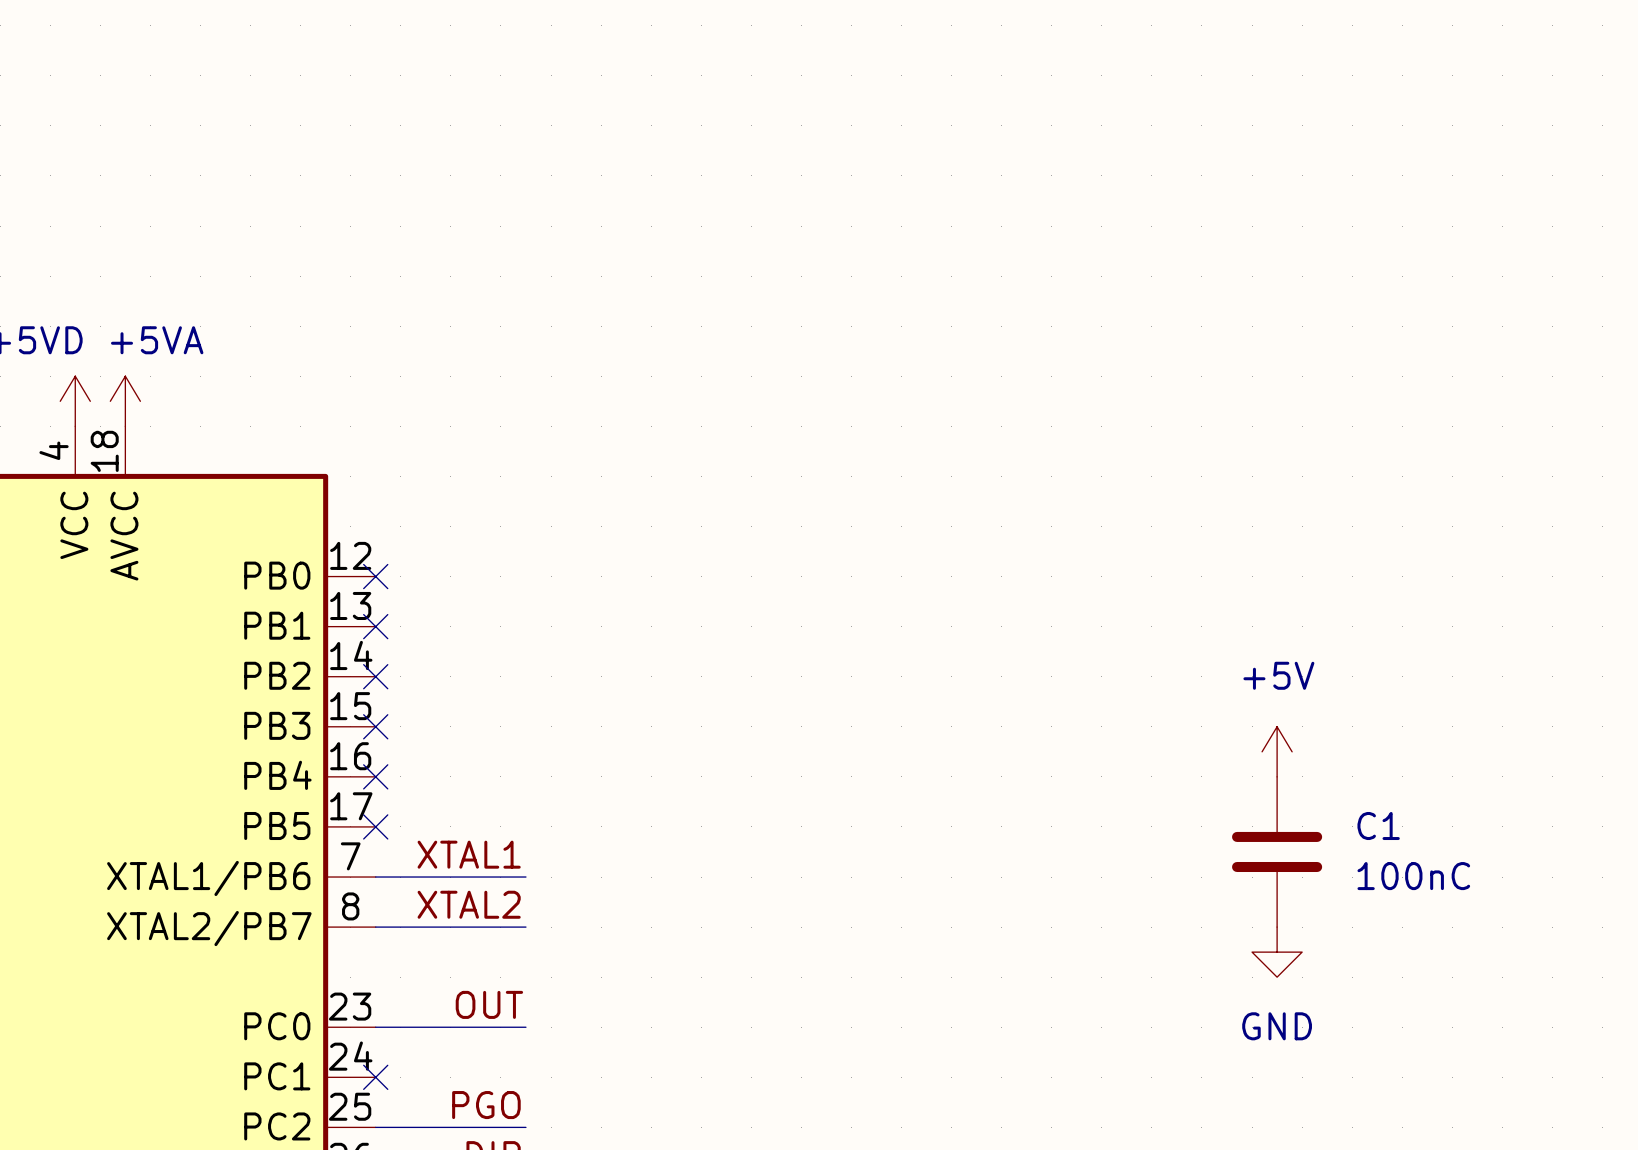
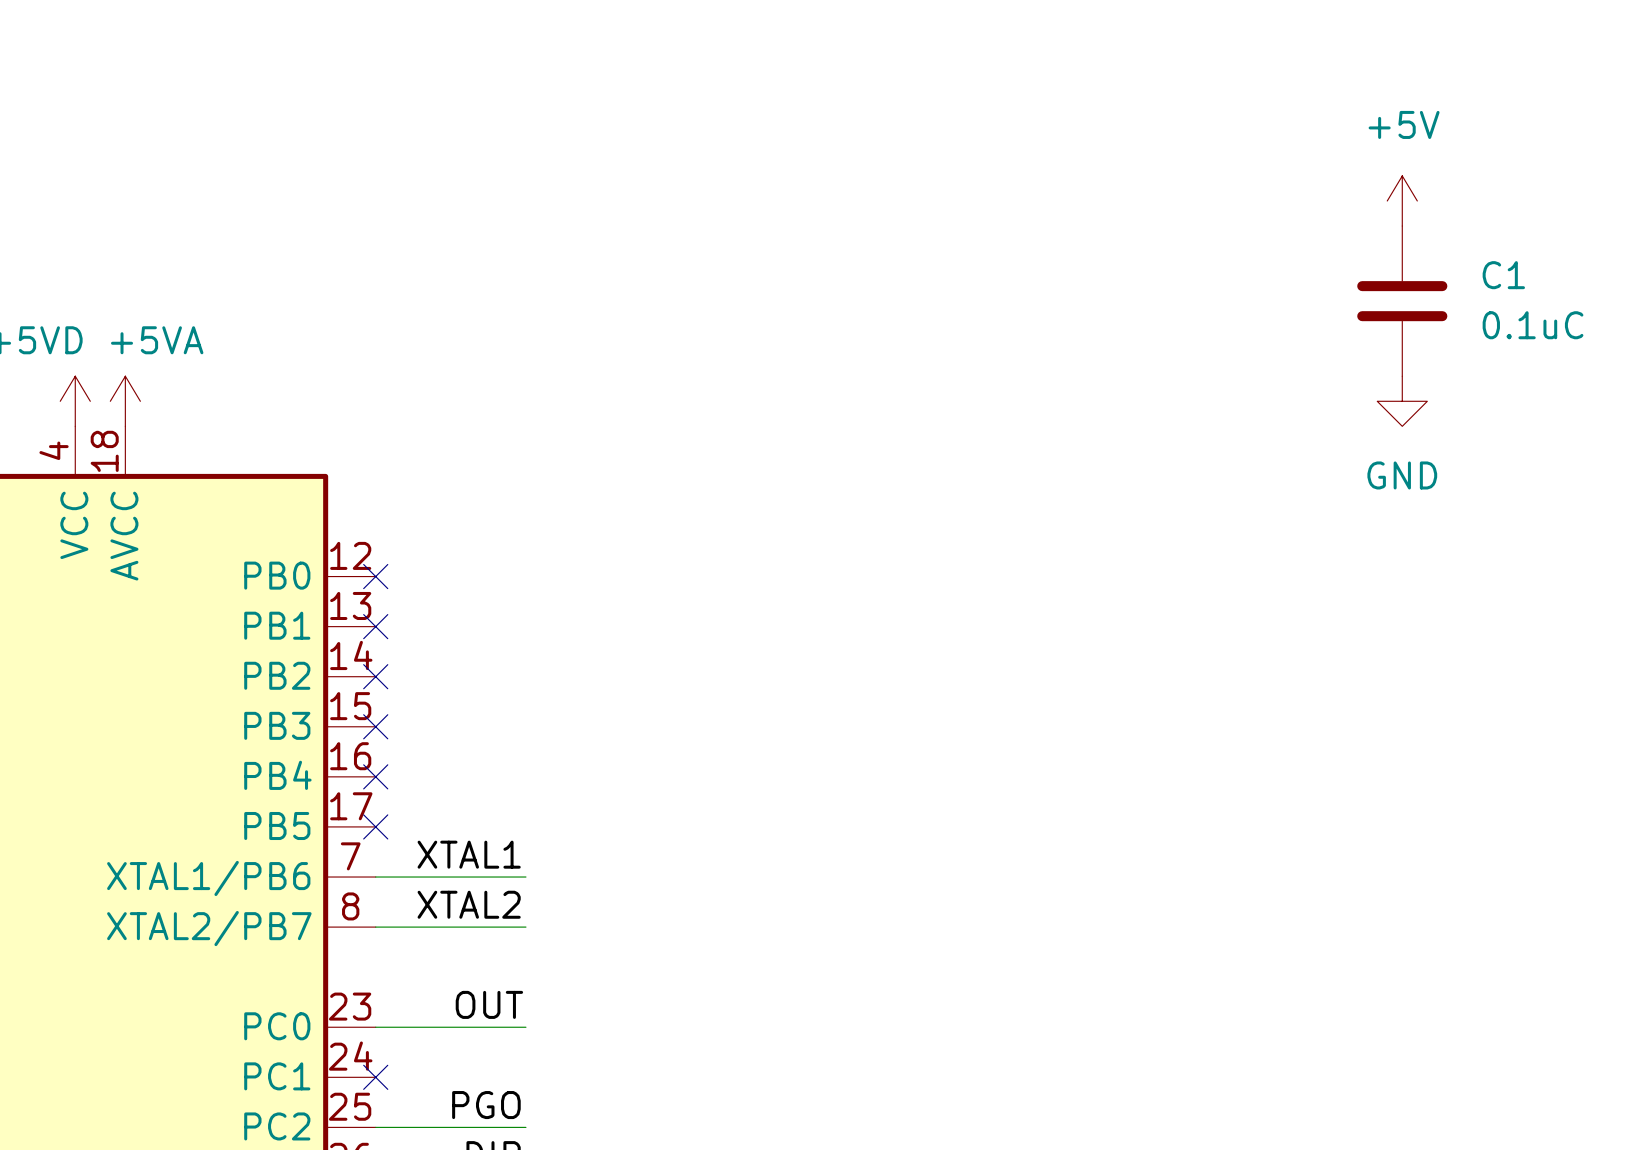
power symbol: none -> +5V (1402, 200)
power symbol: none -> GND (1402, 401)
power symbol: +5V (1277, 751) -> none
C1 position: (1277, 851) -> (1402, 301)
C1 value: 100nC (1413, 876) -> 0.1uC (1533, 325)
power symbol: GND (1277, 952) -> none

